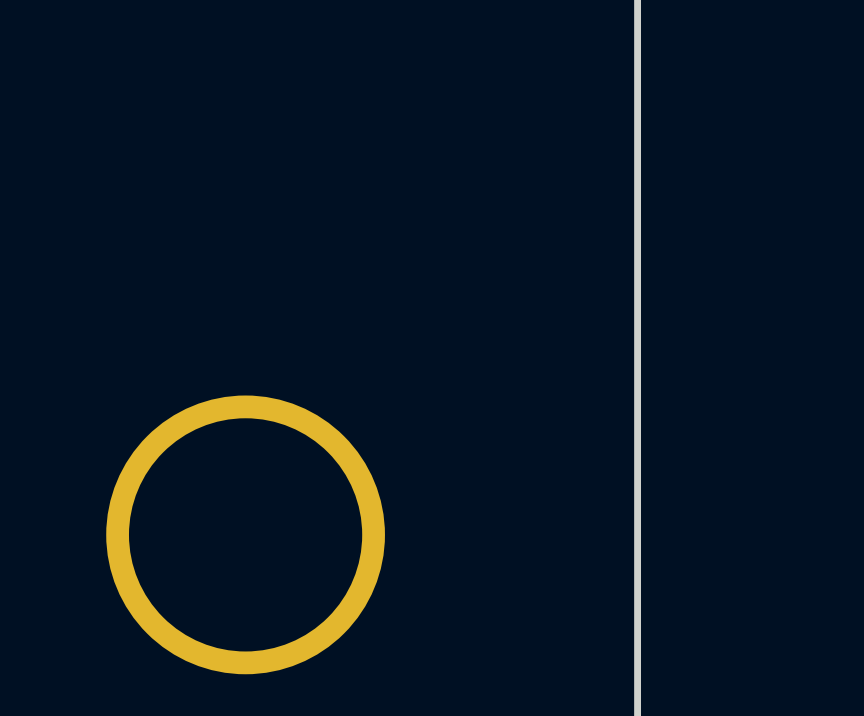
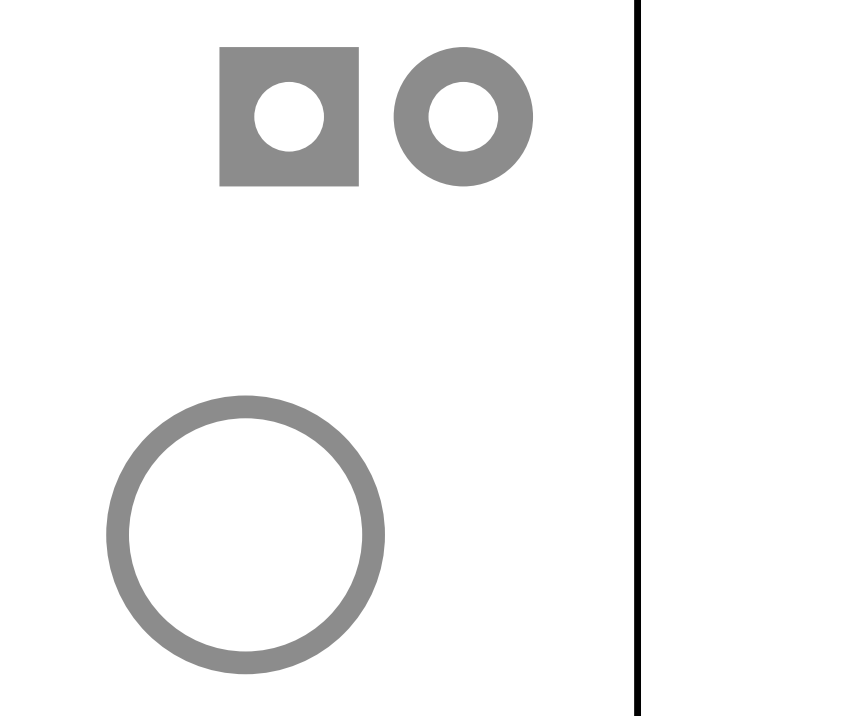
part: none -> (376, 116)

